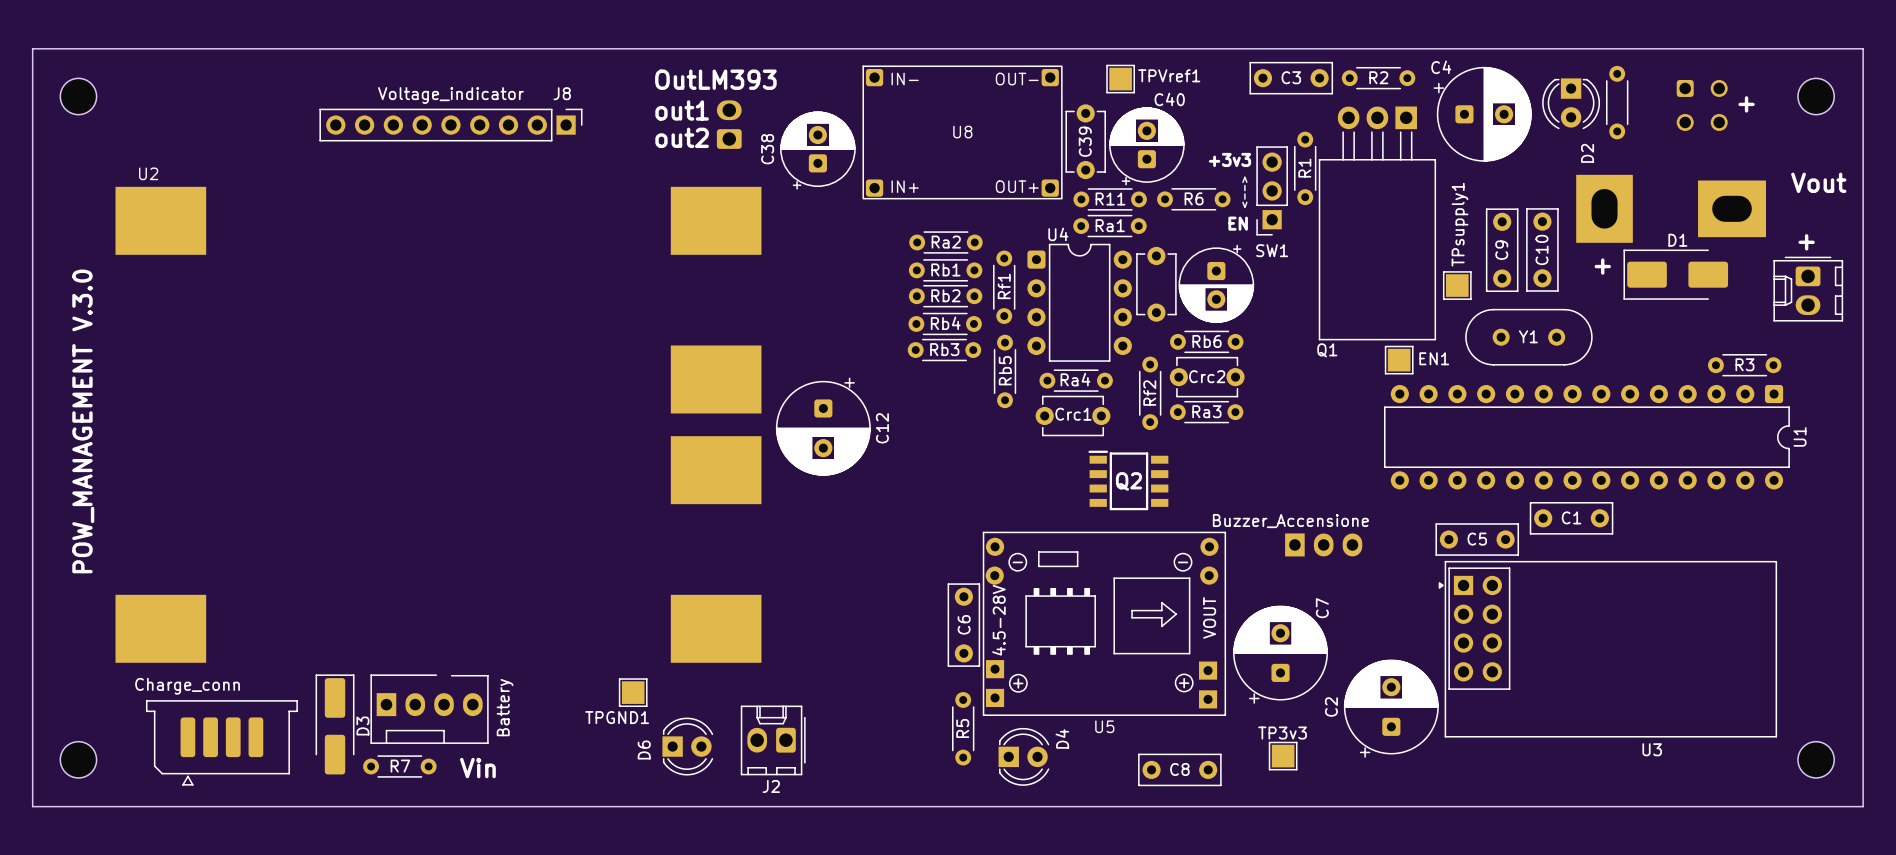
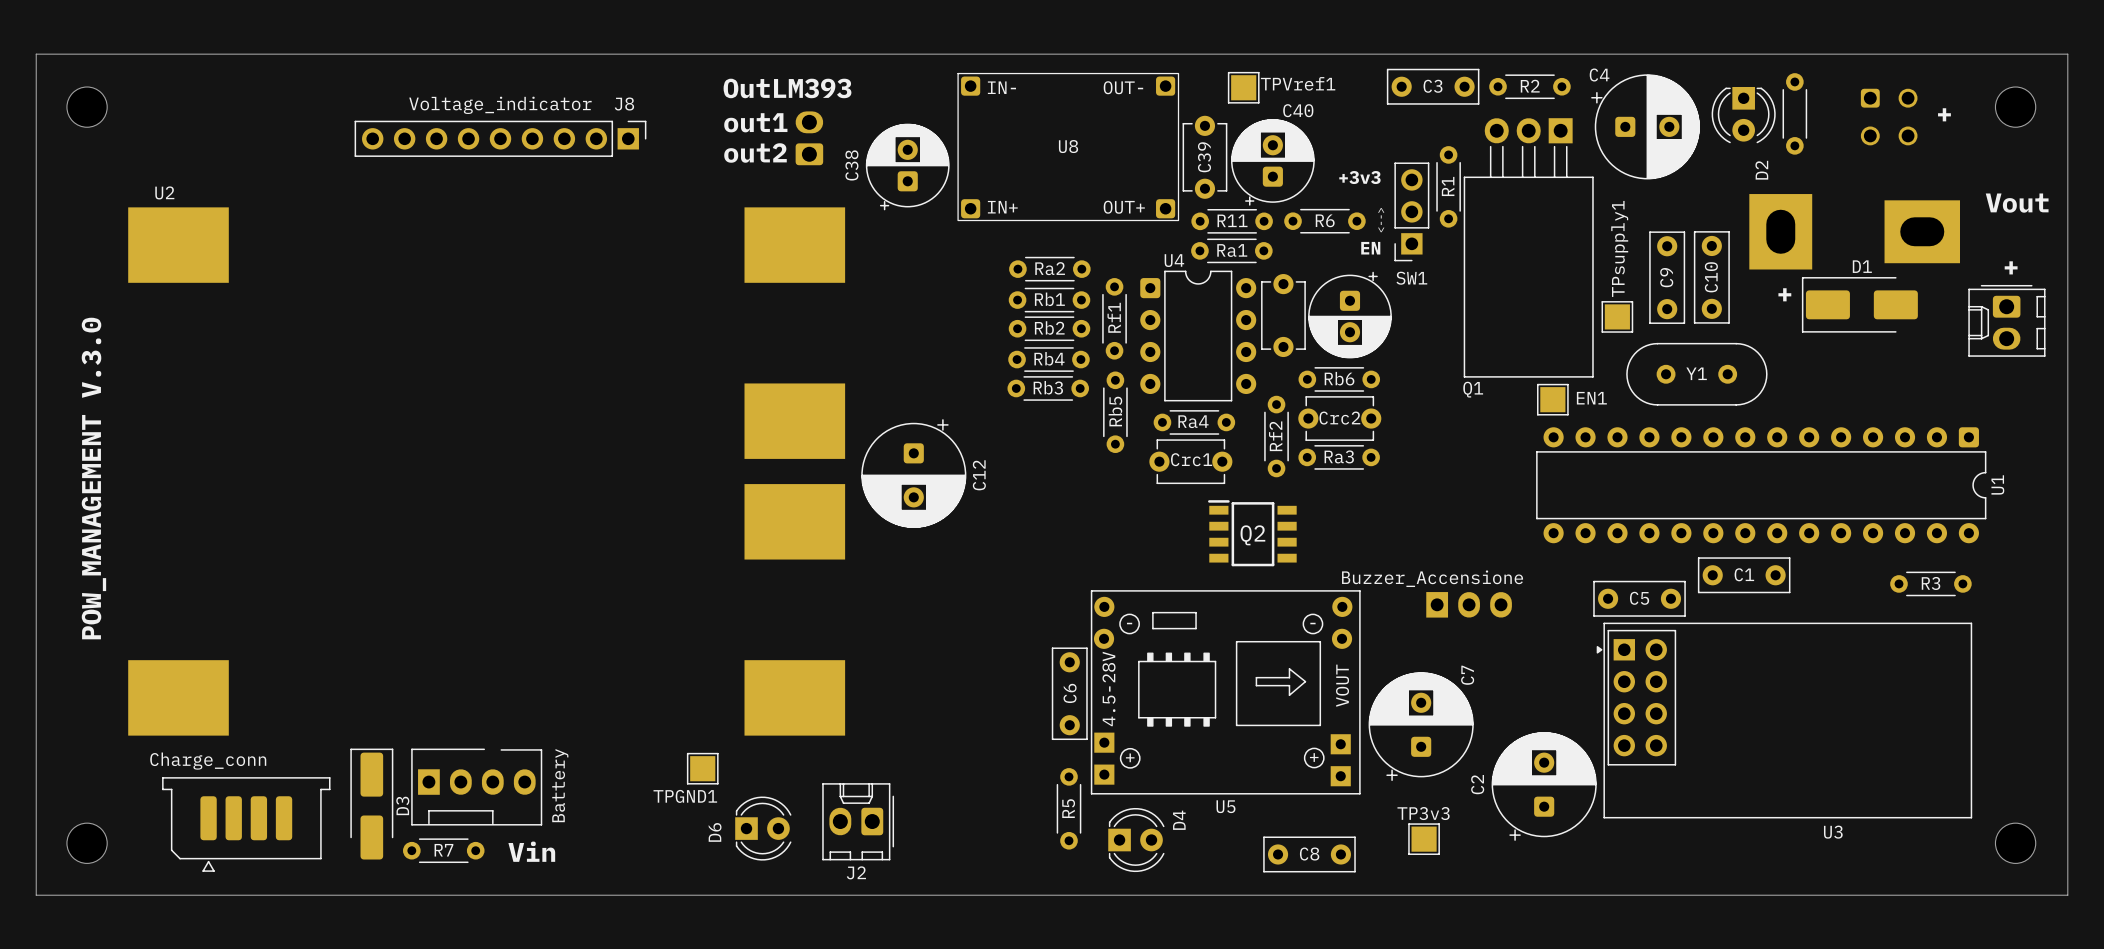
R3 position: (1744, 365) -> (1930, 583)

